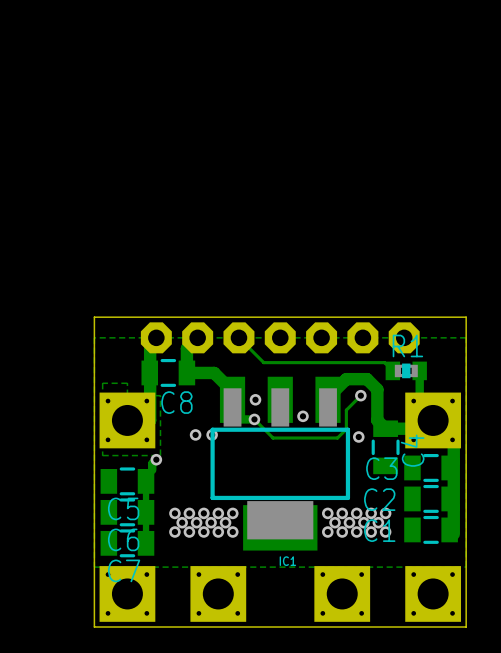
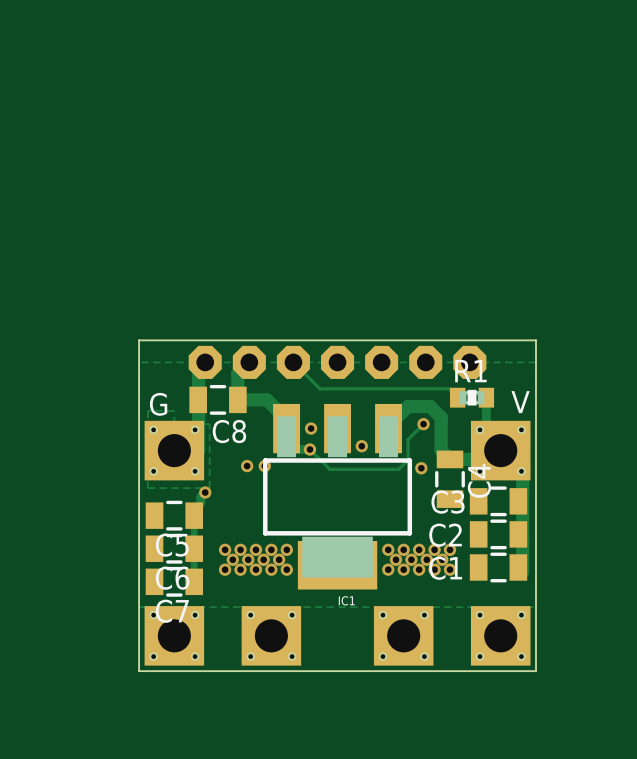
text: none -> V (520, 402)
text: none -> G (158, 404)

